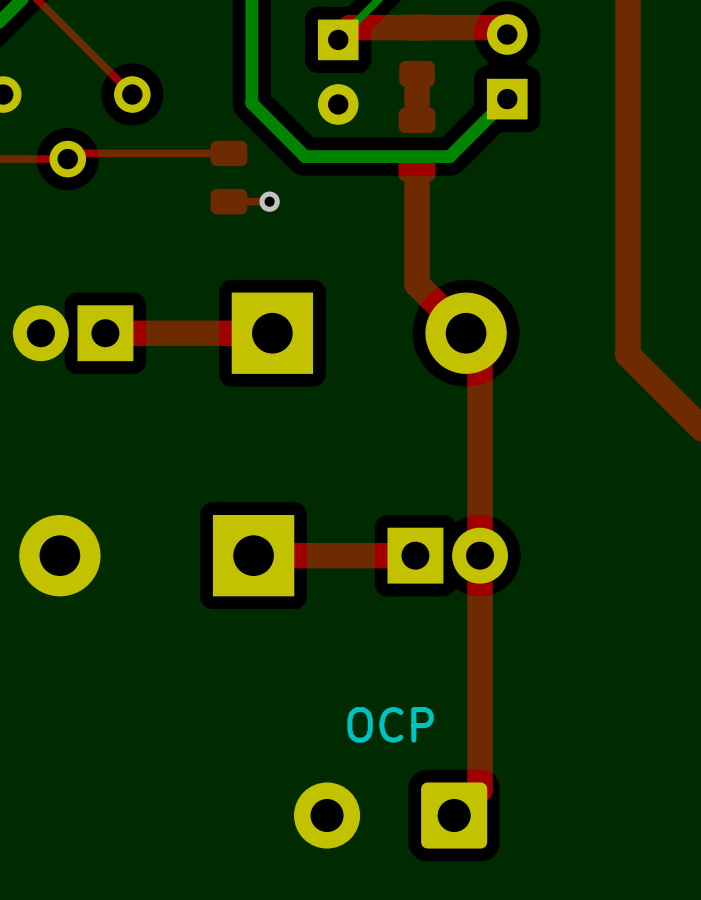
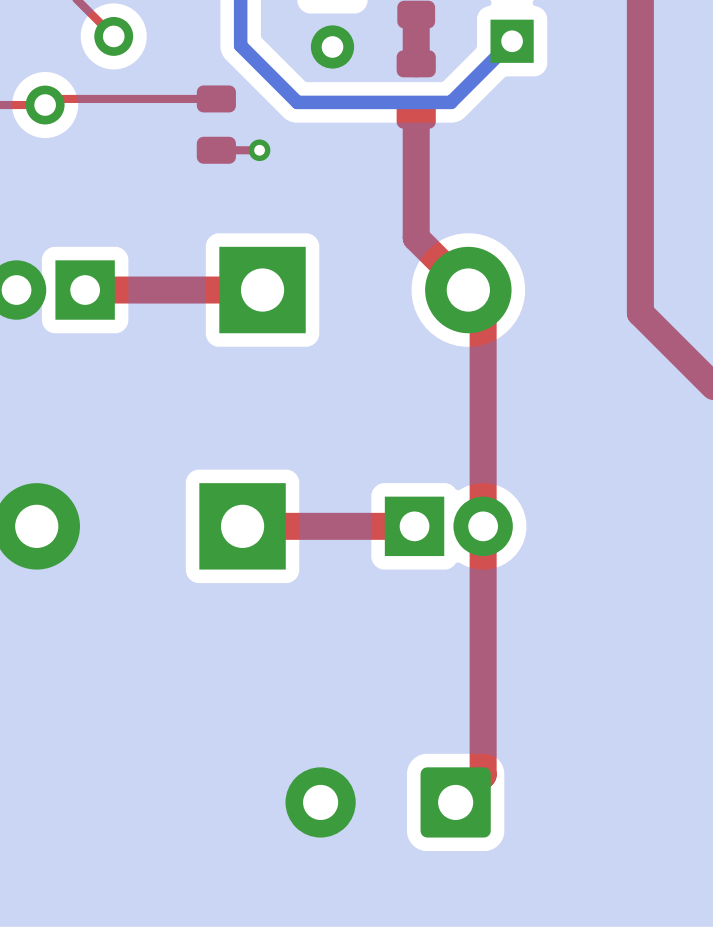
text: OCP (390, 724) -> none

